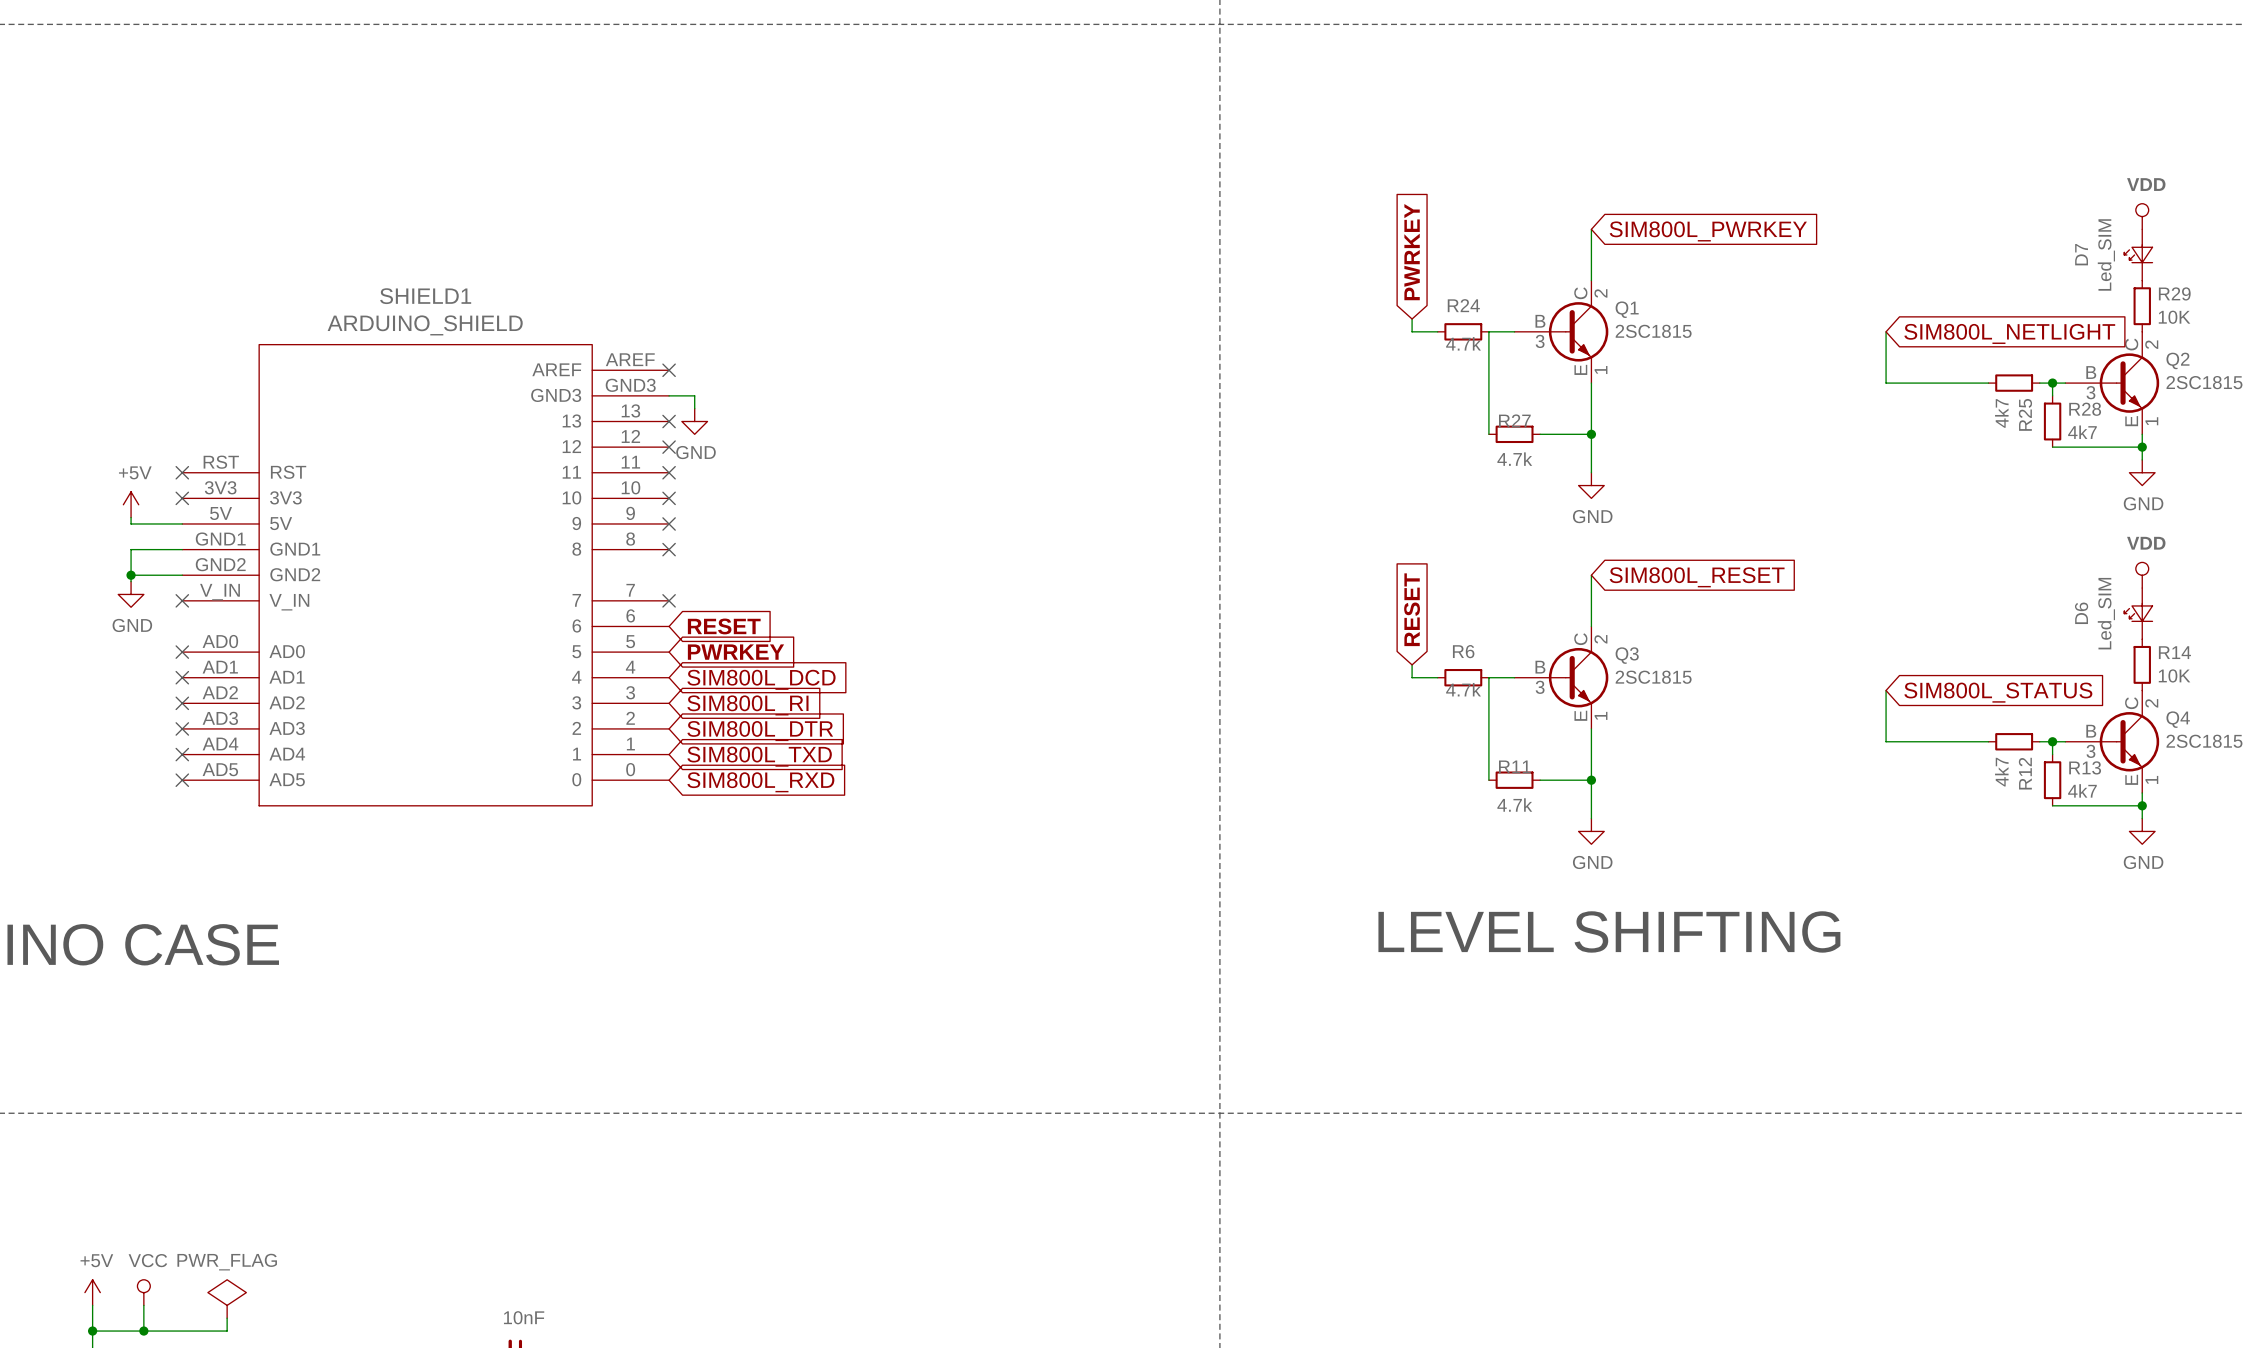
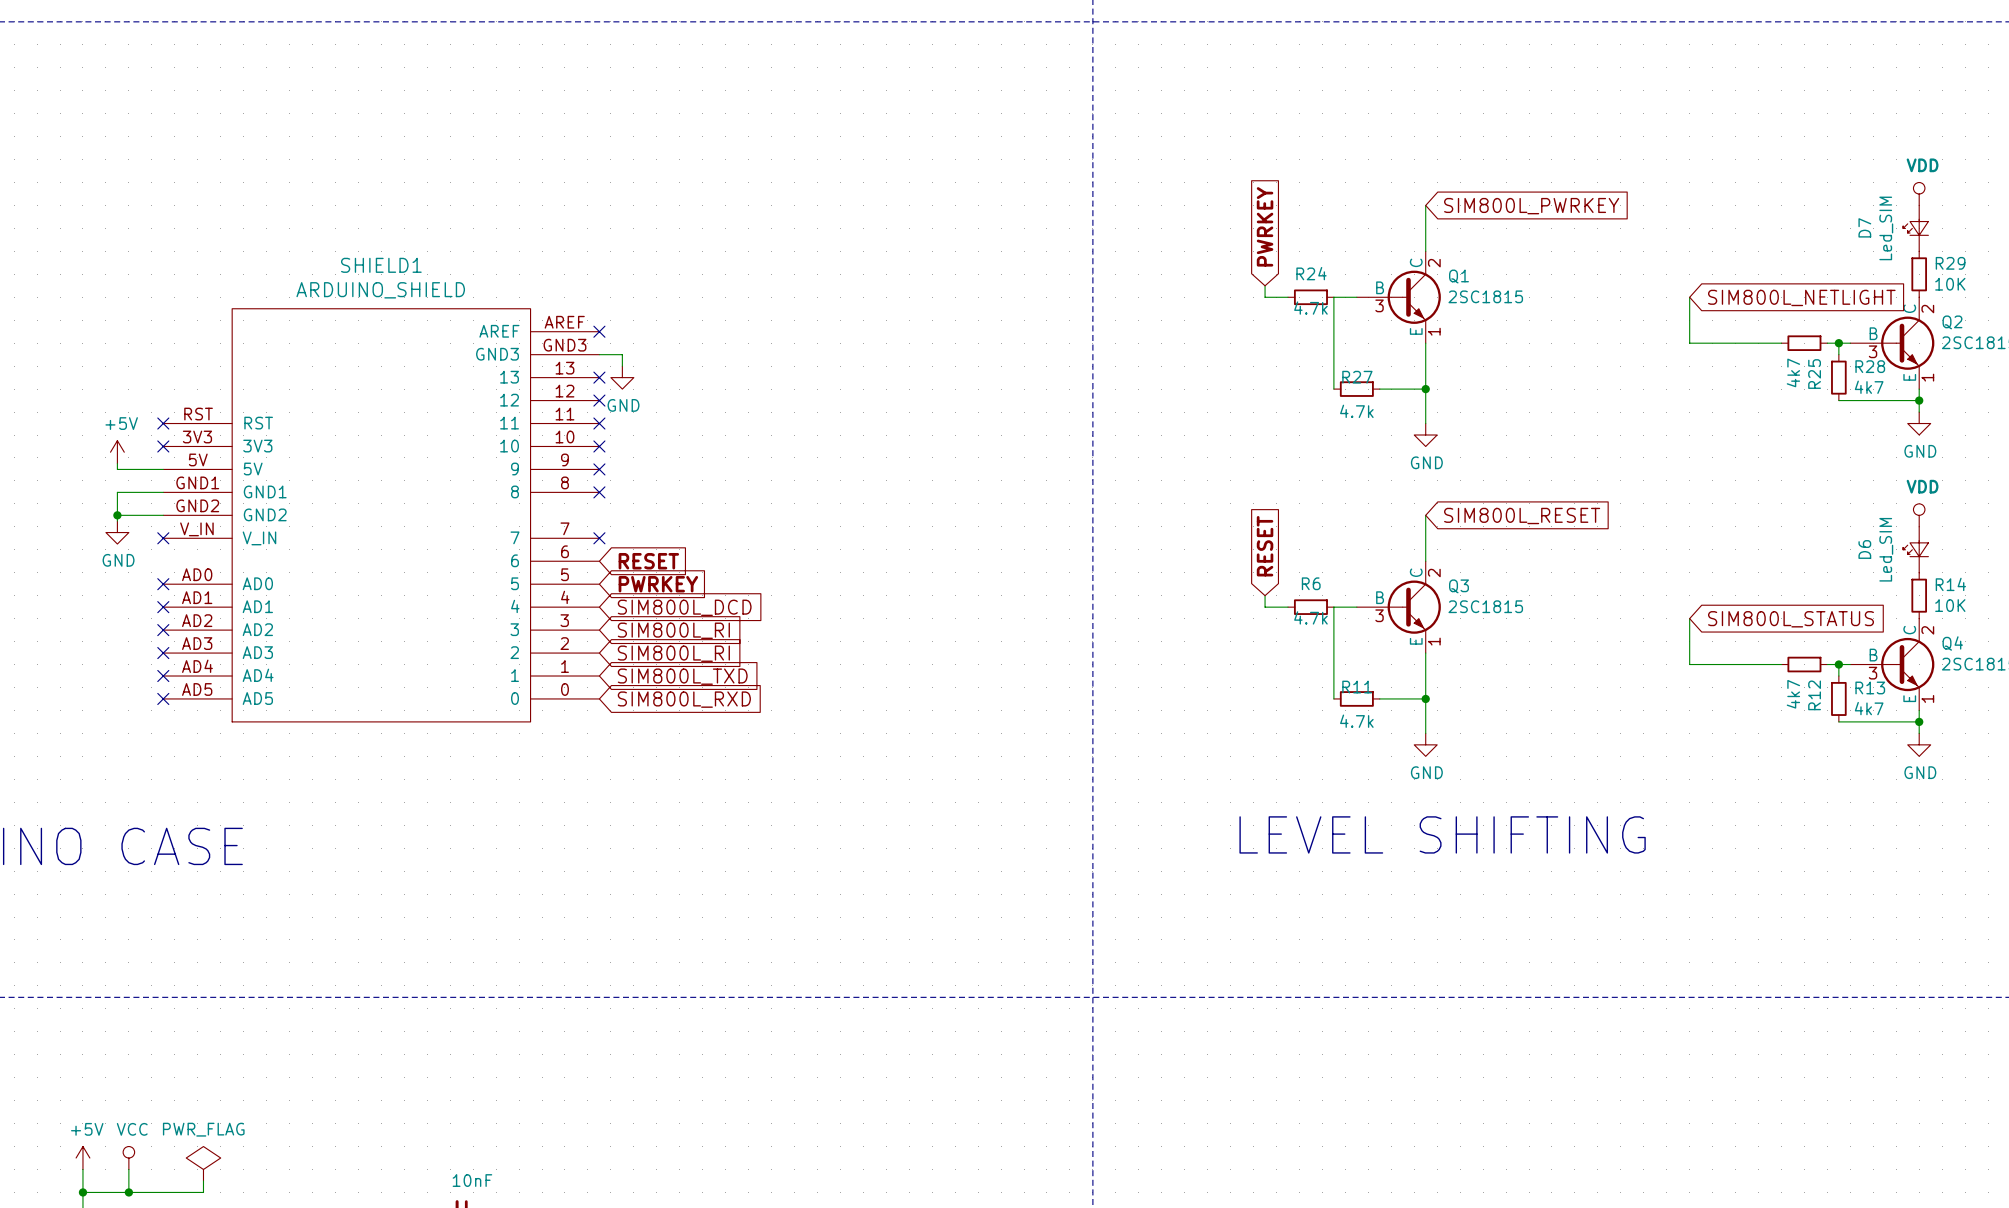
global label: SIM800L_DTR (760, 731) -> SIM800L_RI (673, 653)

